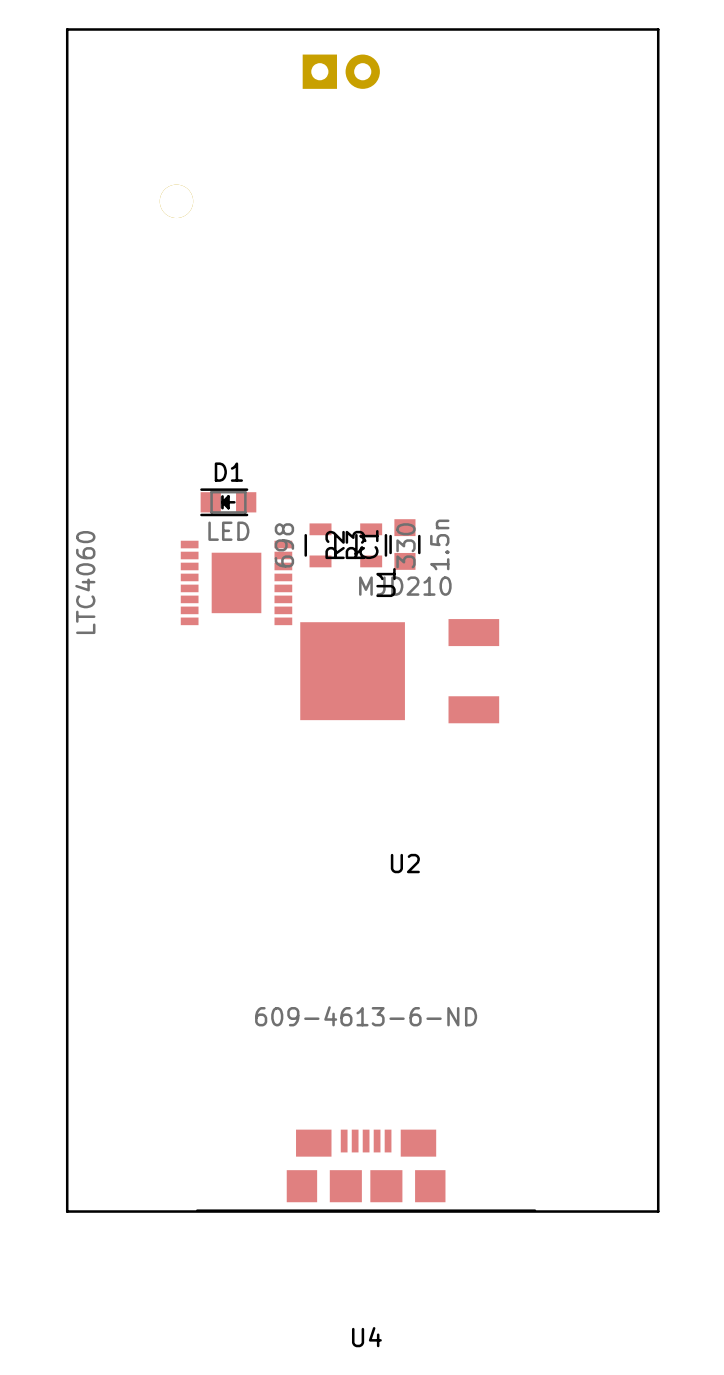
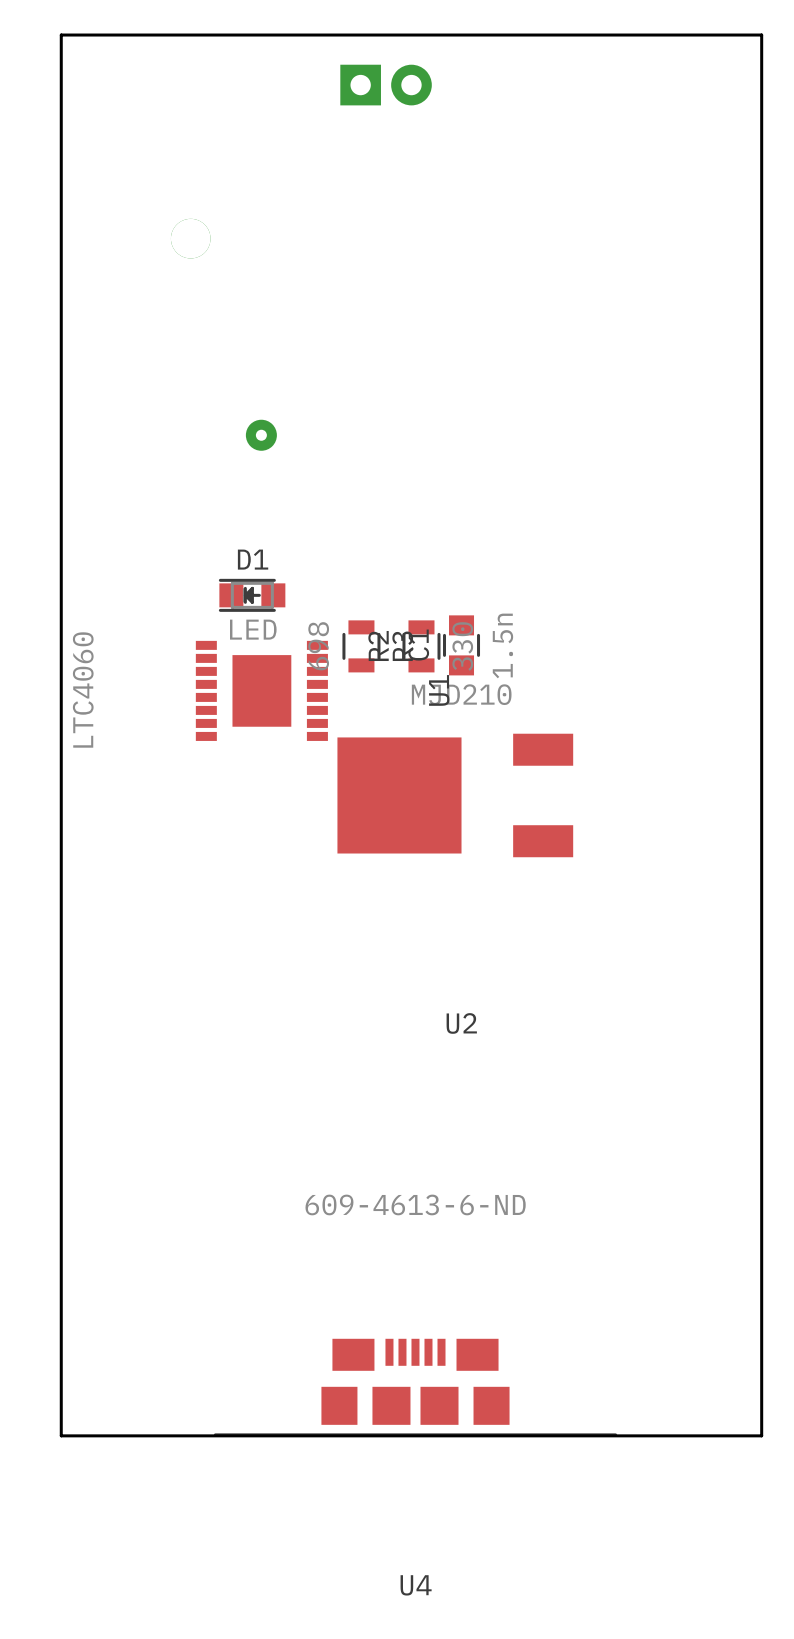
part: none -> (261, 435)

